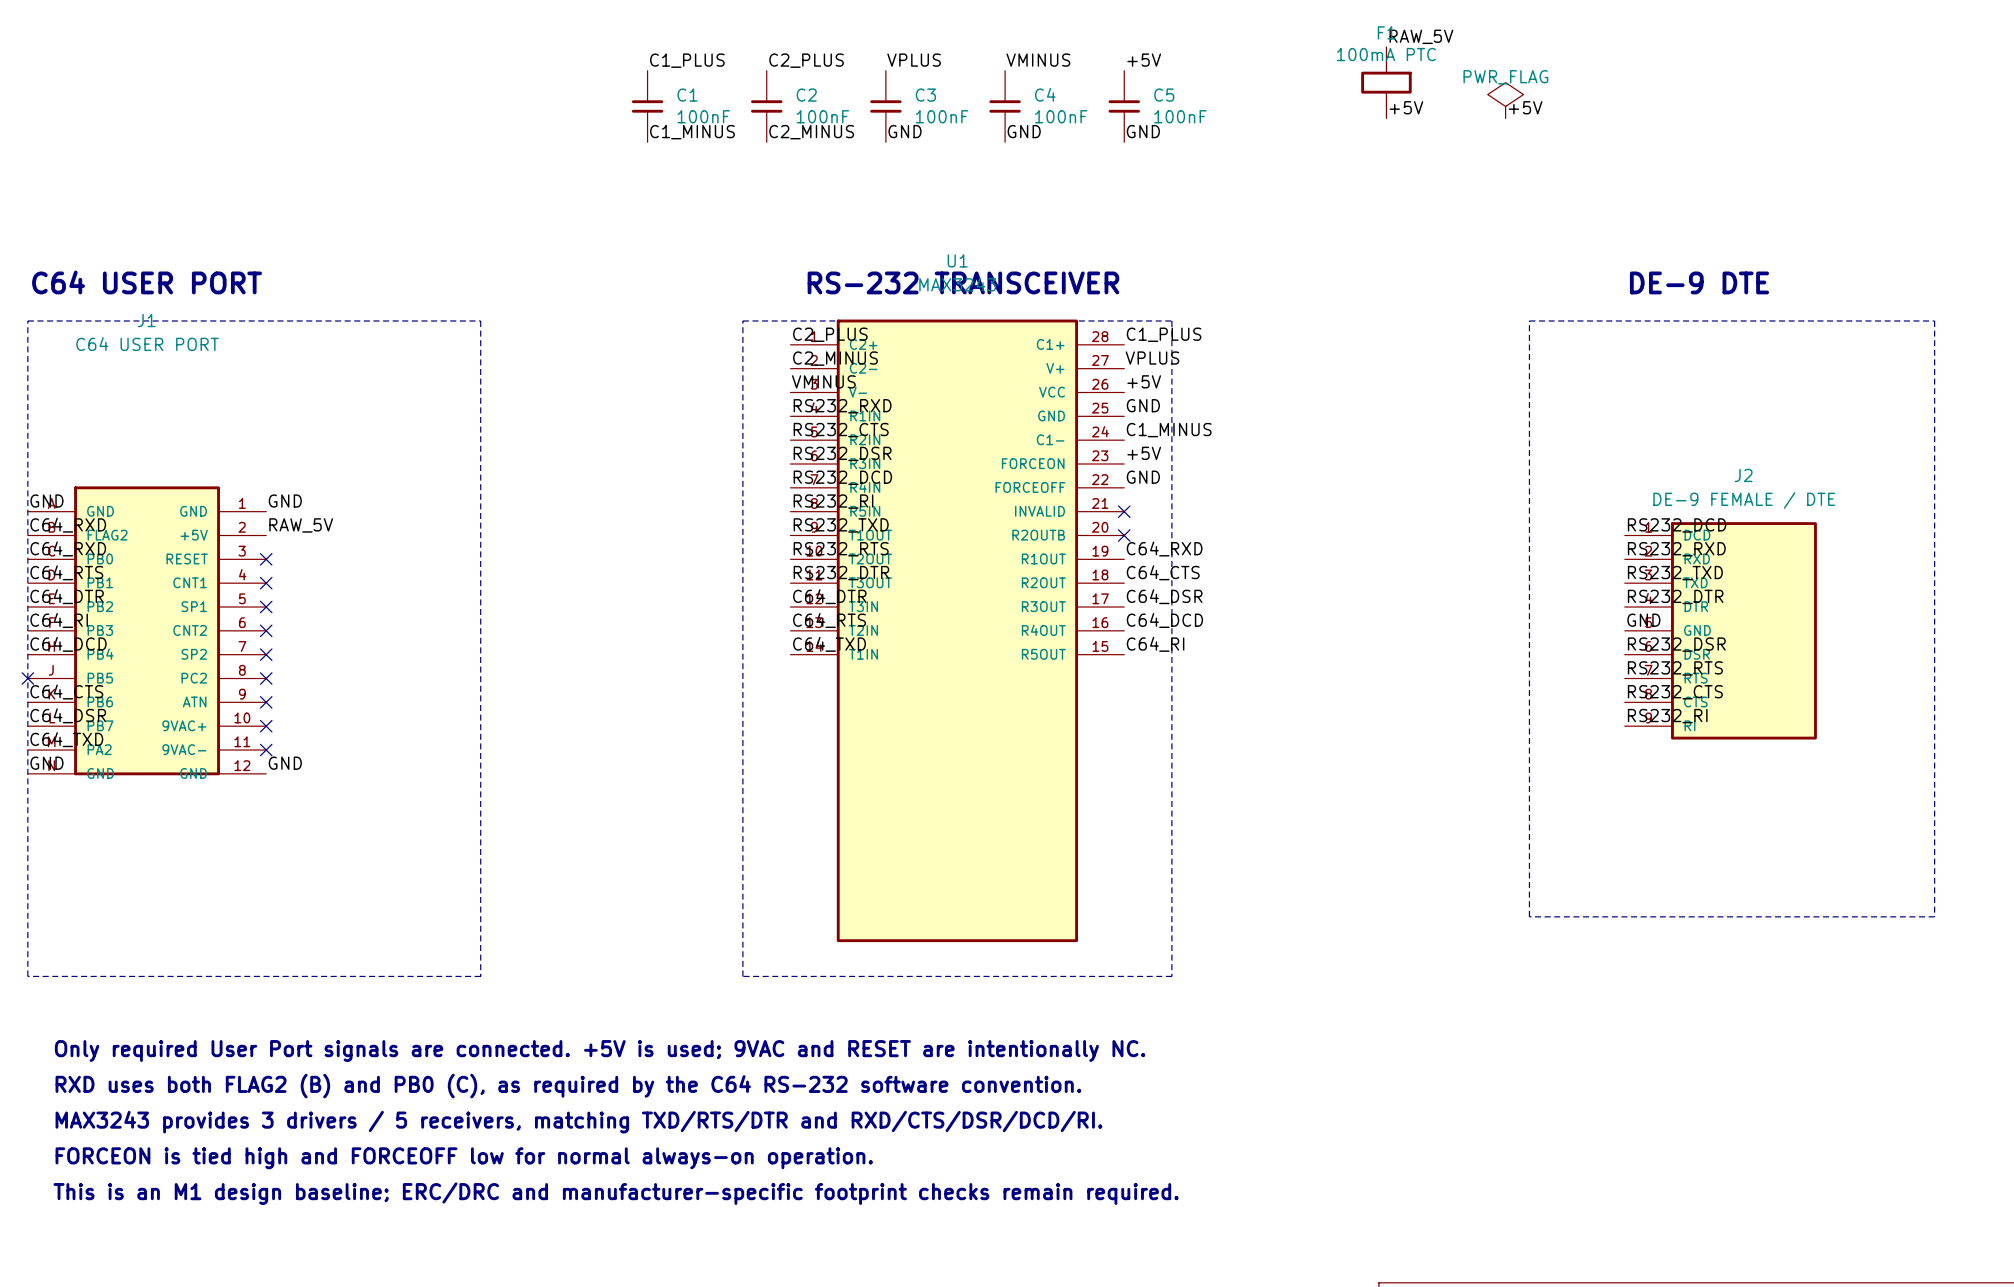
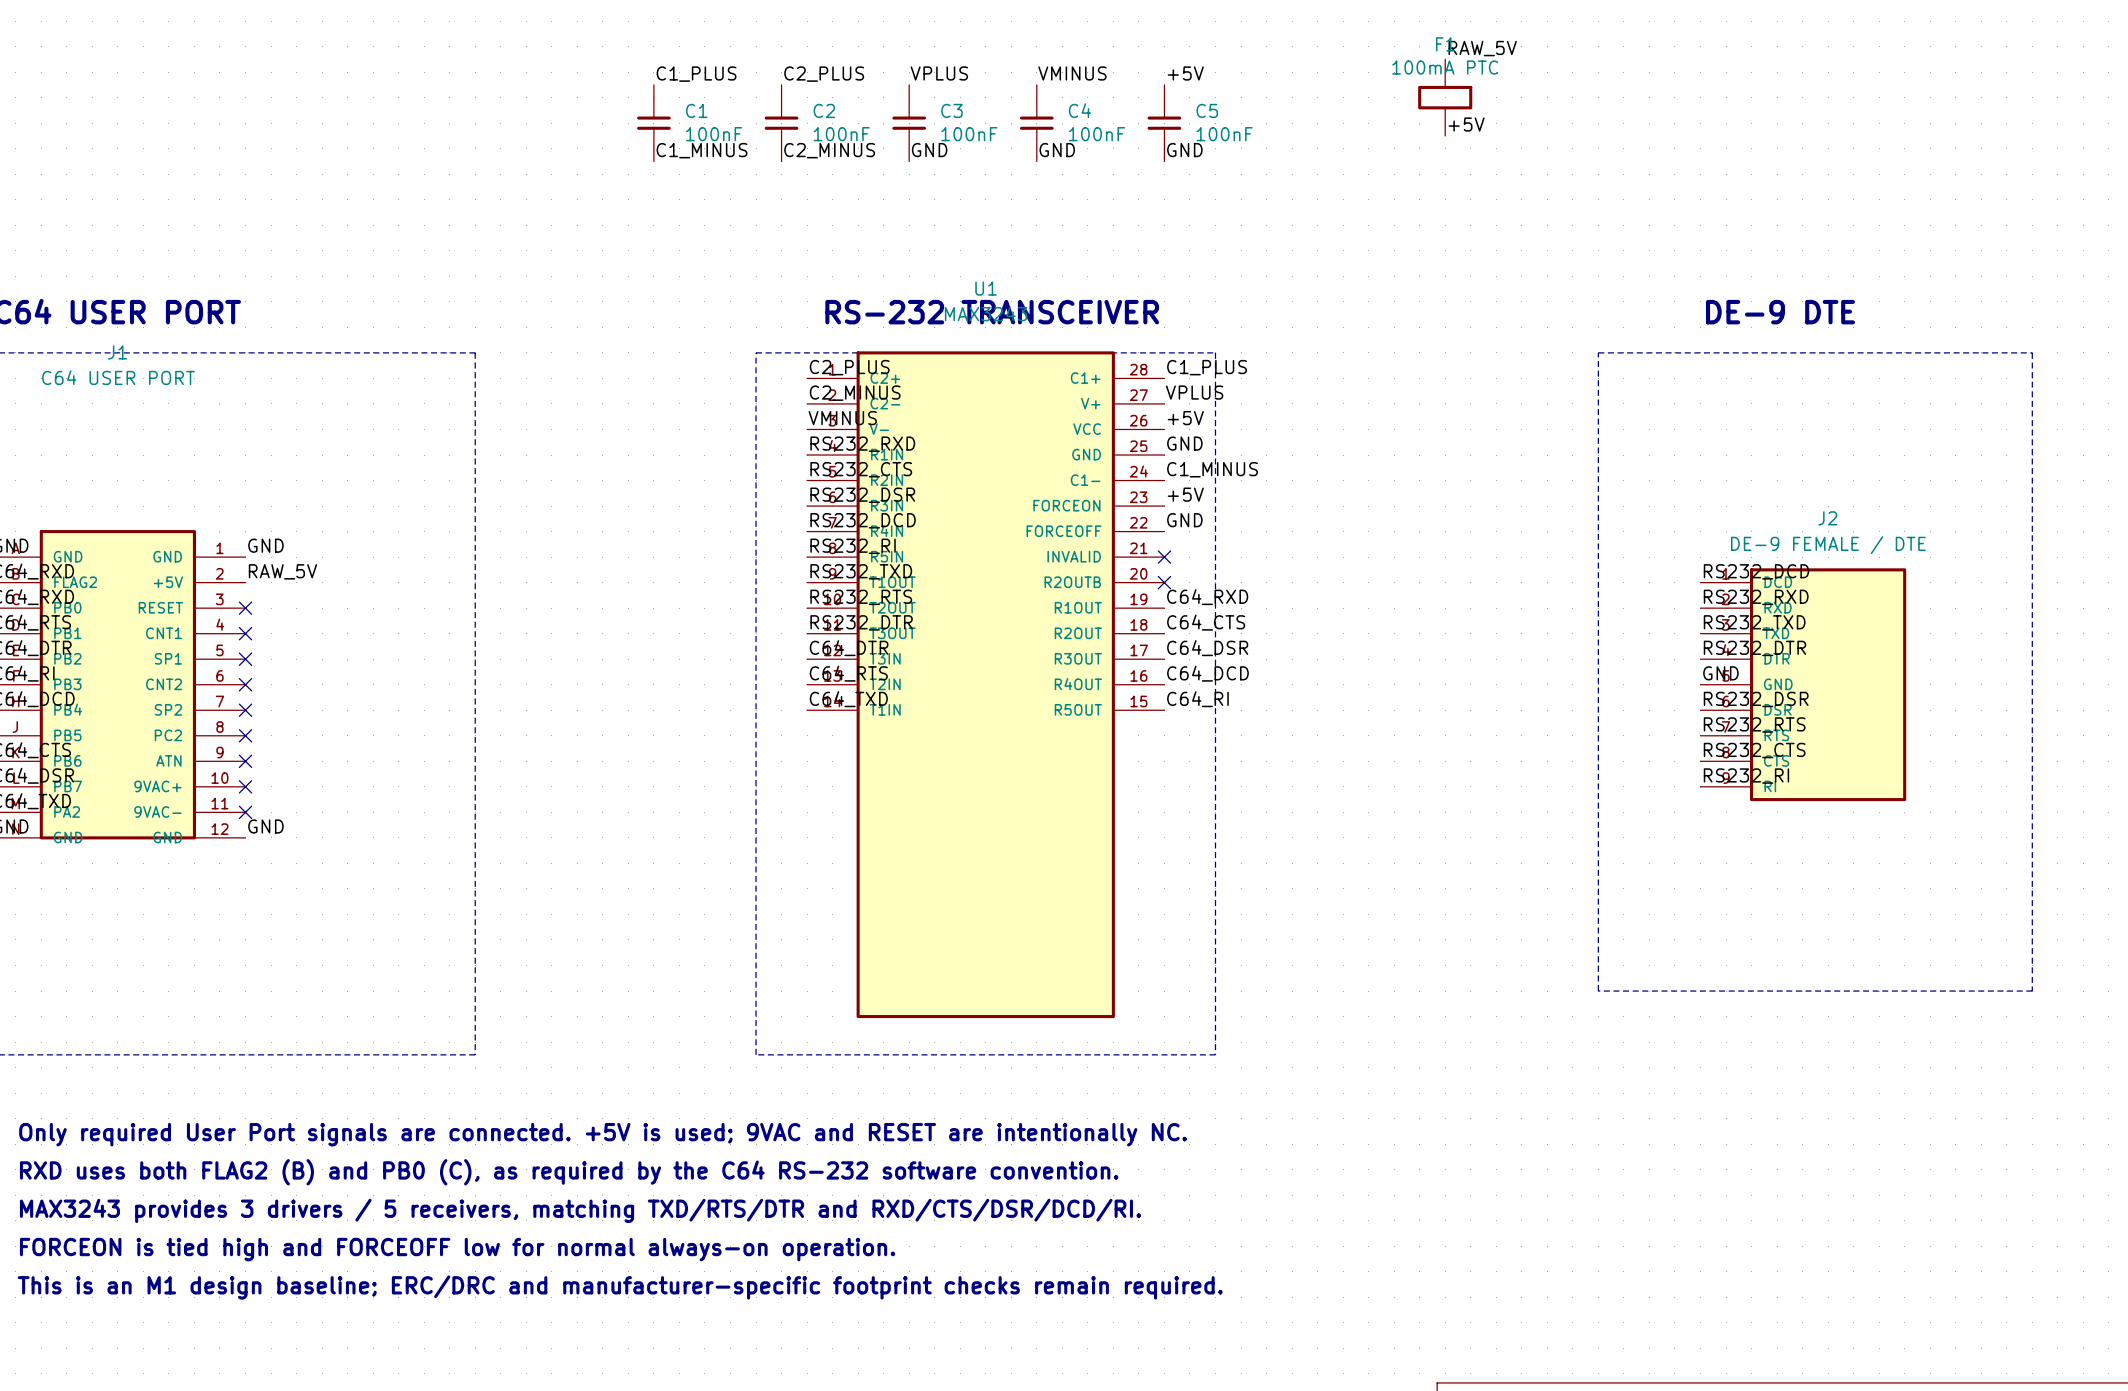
power symbol: PWR_FLAG (1505, 100) -> none
label: +5V (1525, 107) -> none

